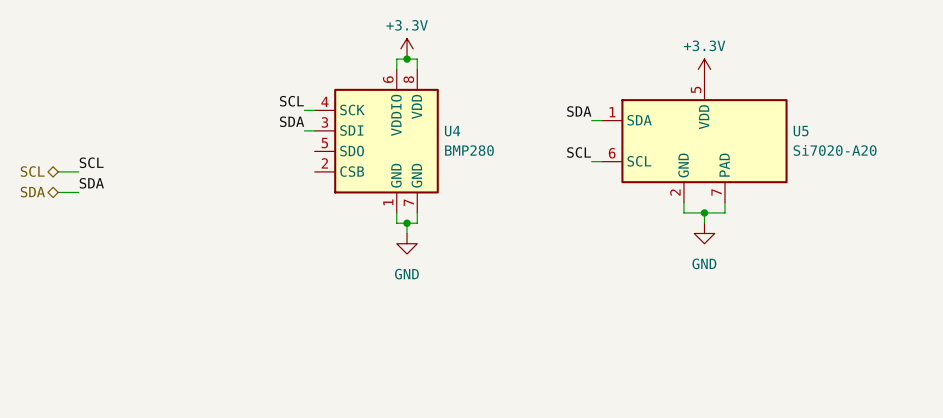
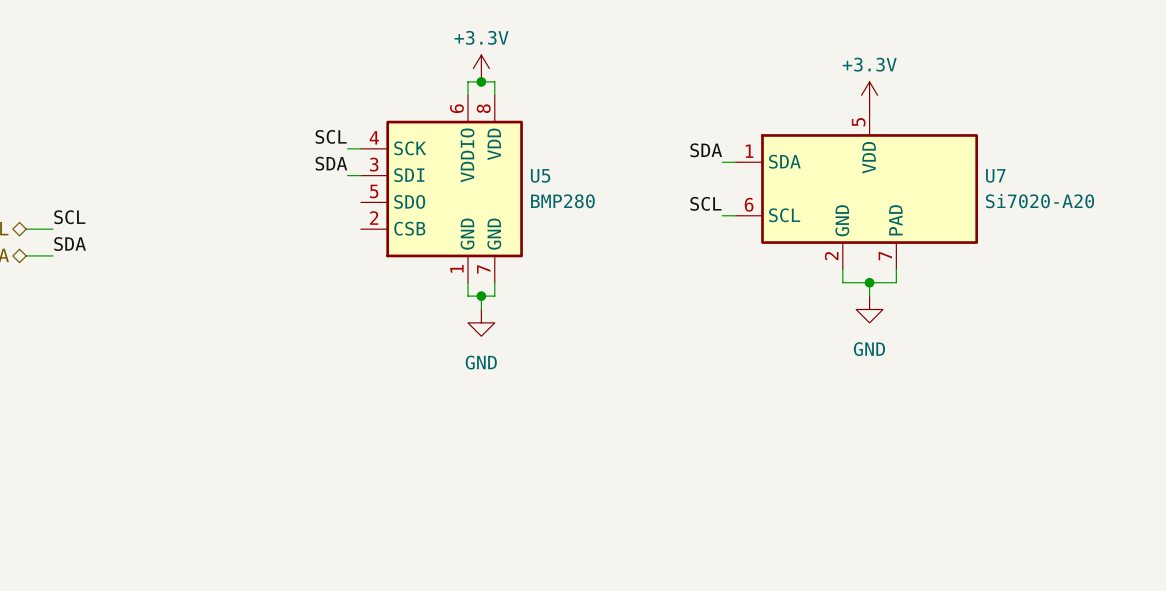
U4 name: U4 (452, 131) -> U5 (540, 175)
U5 name: U5 (801, 131) -> U7 (995, 175)

